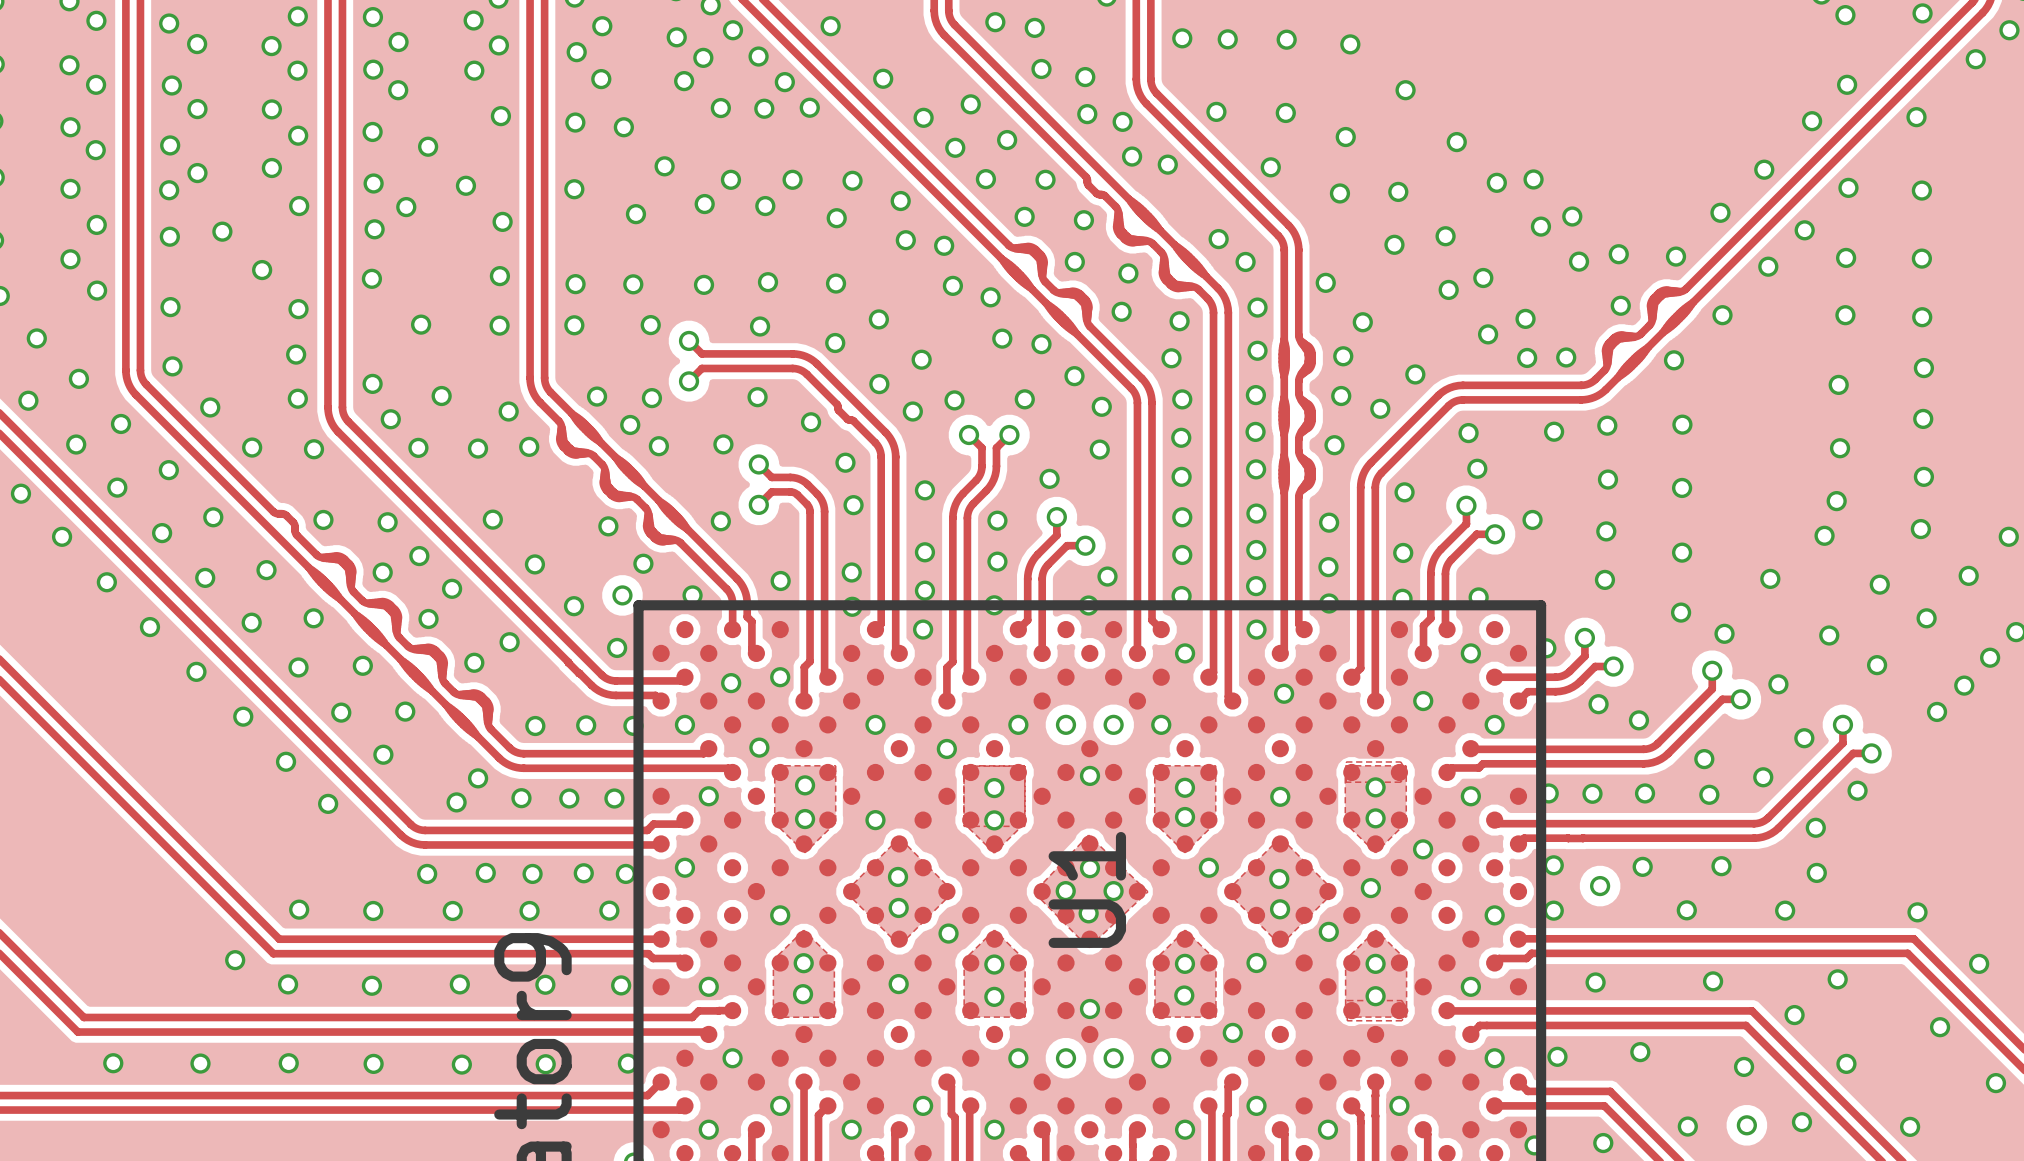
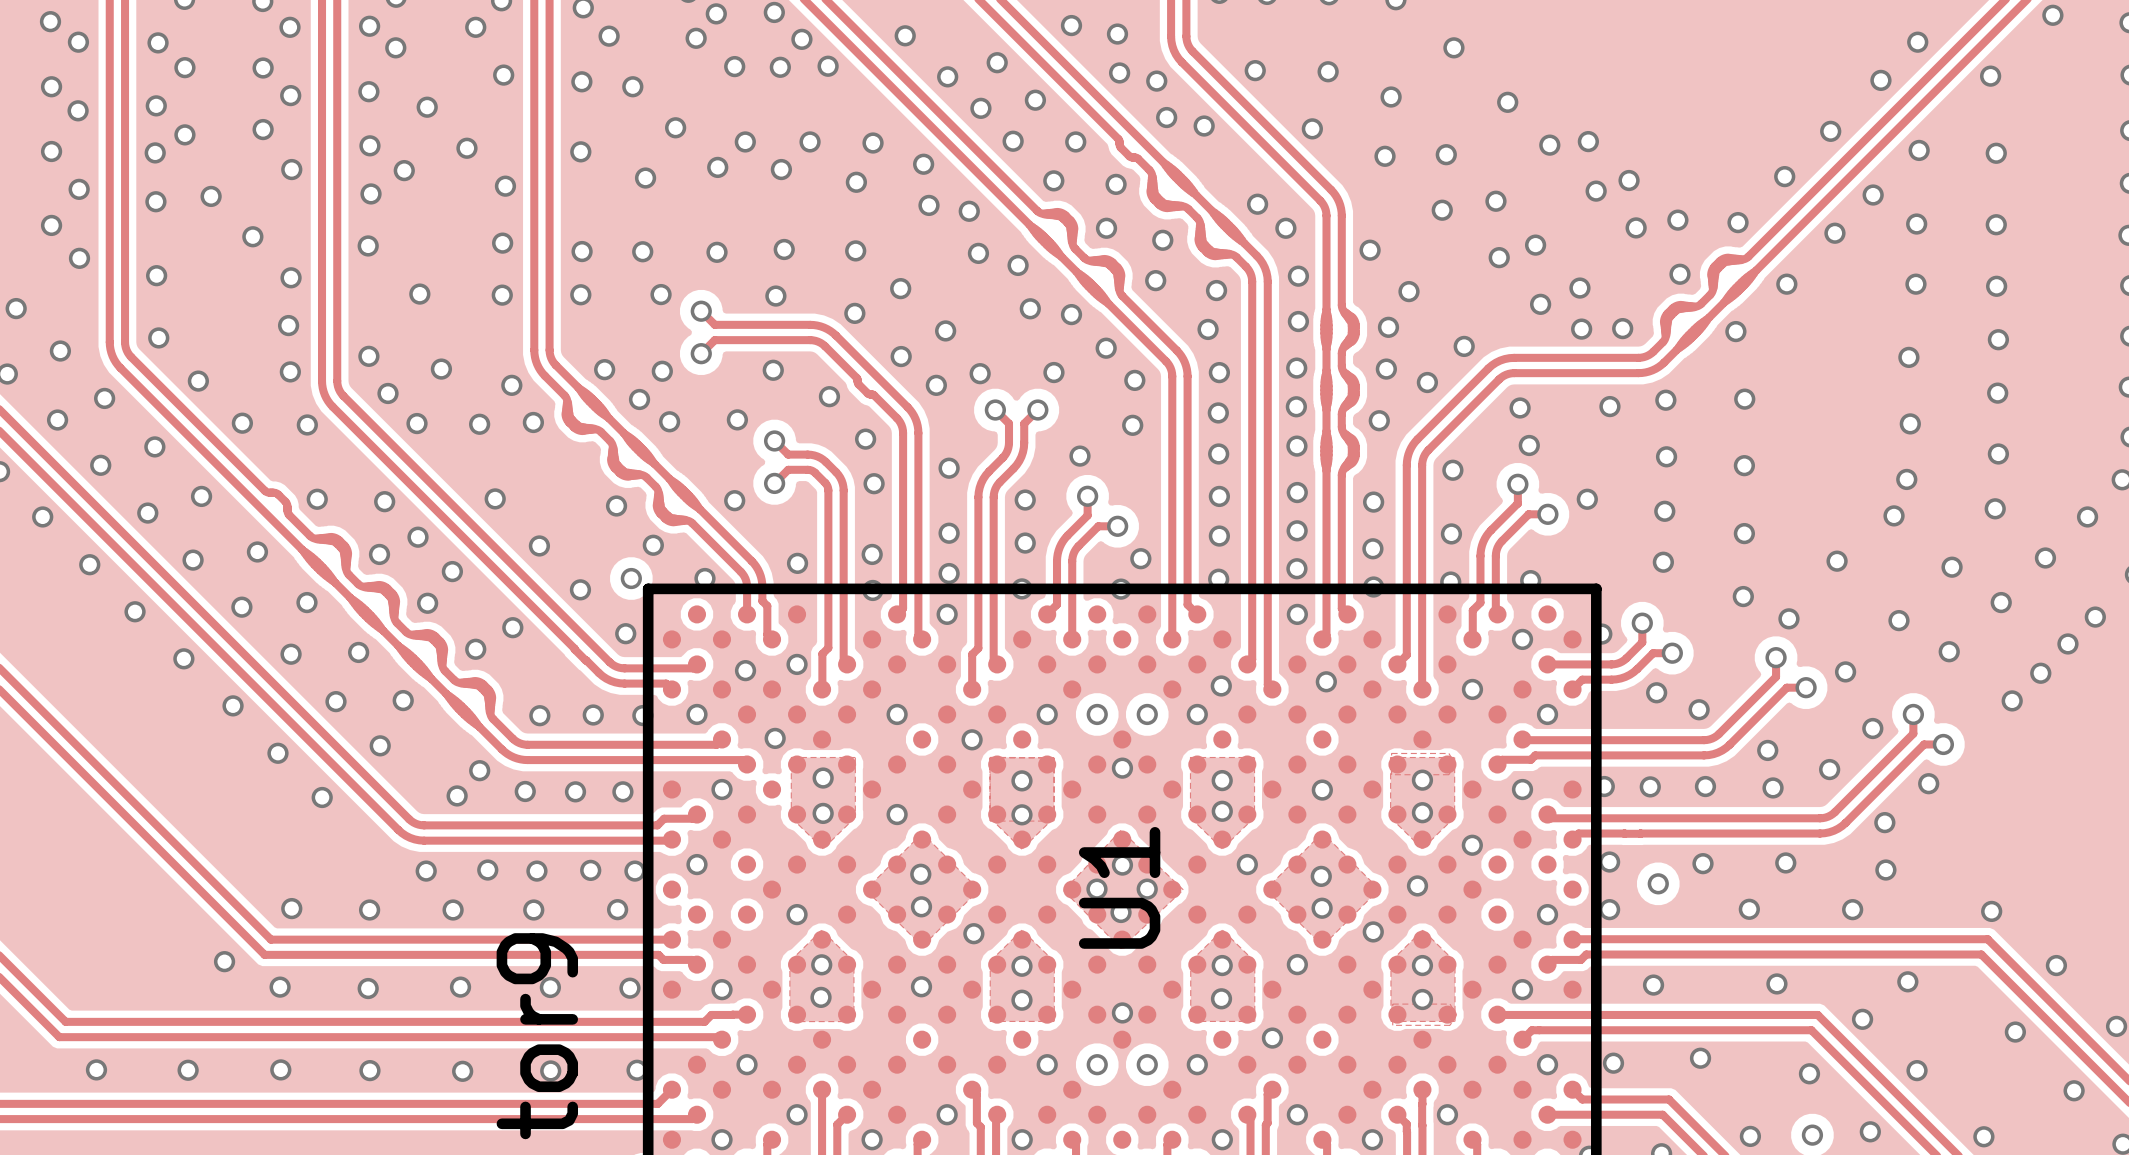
via position: (1185, 653) -> (1221, 685)

